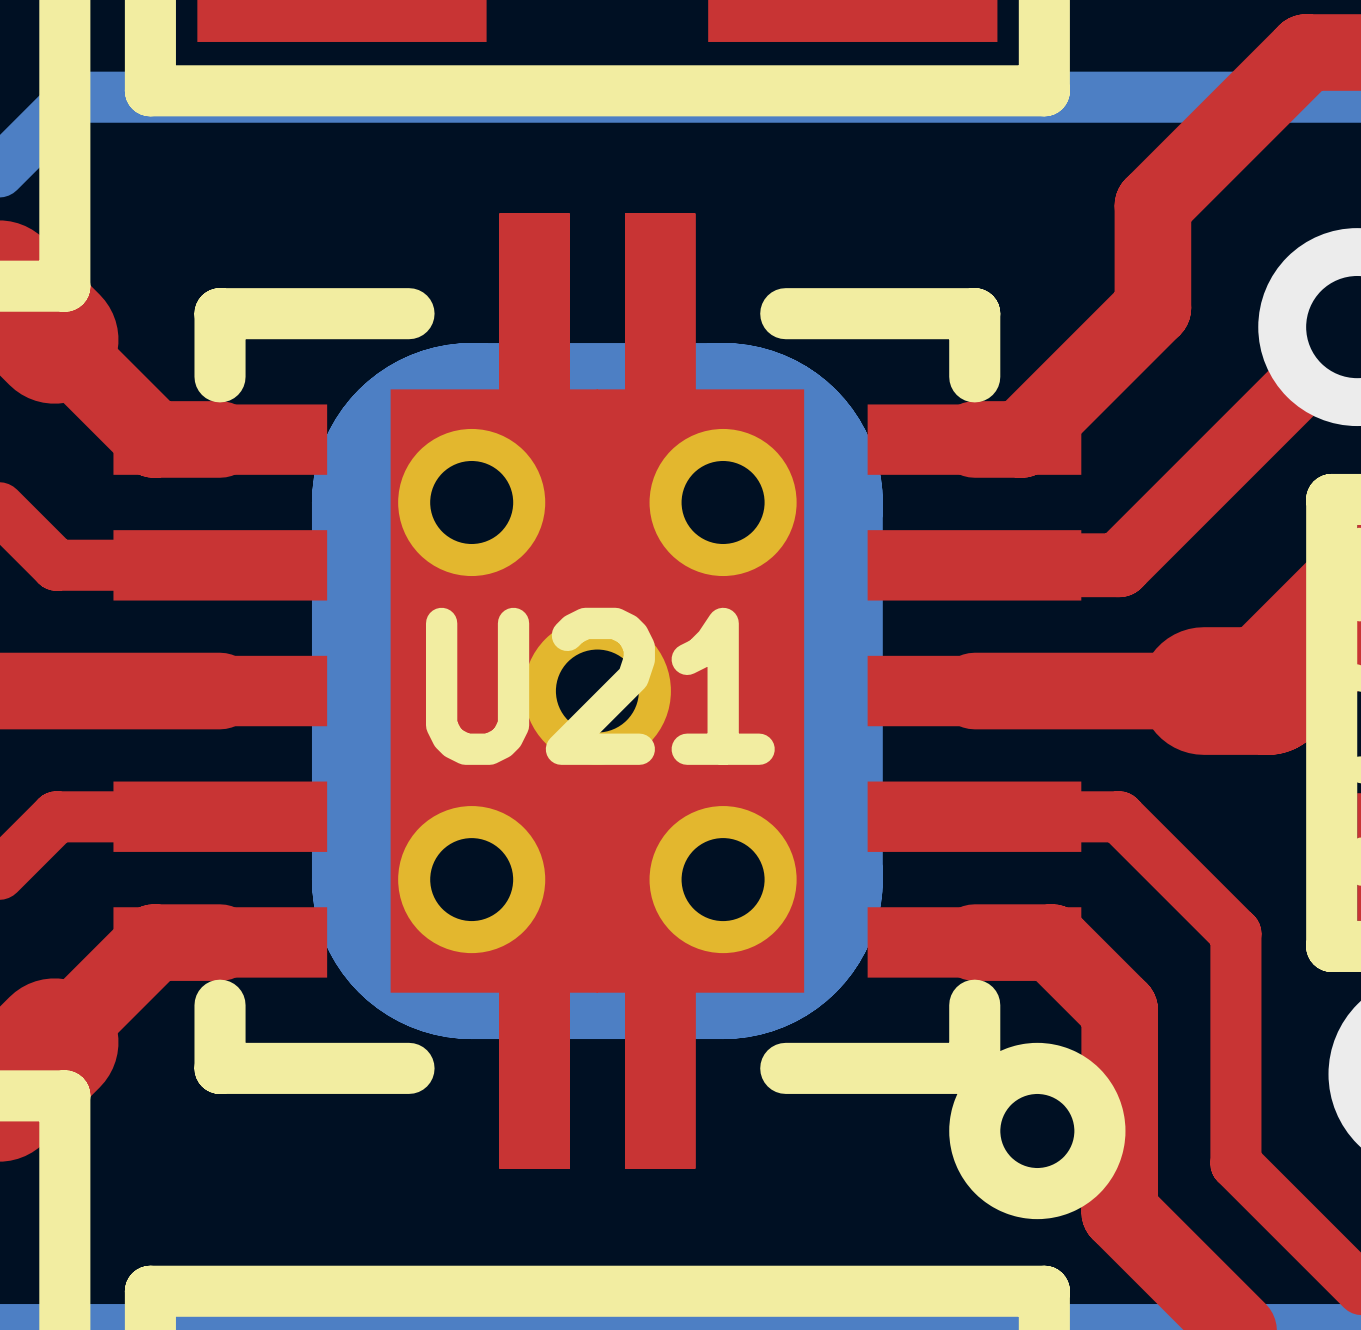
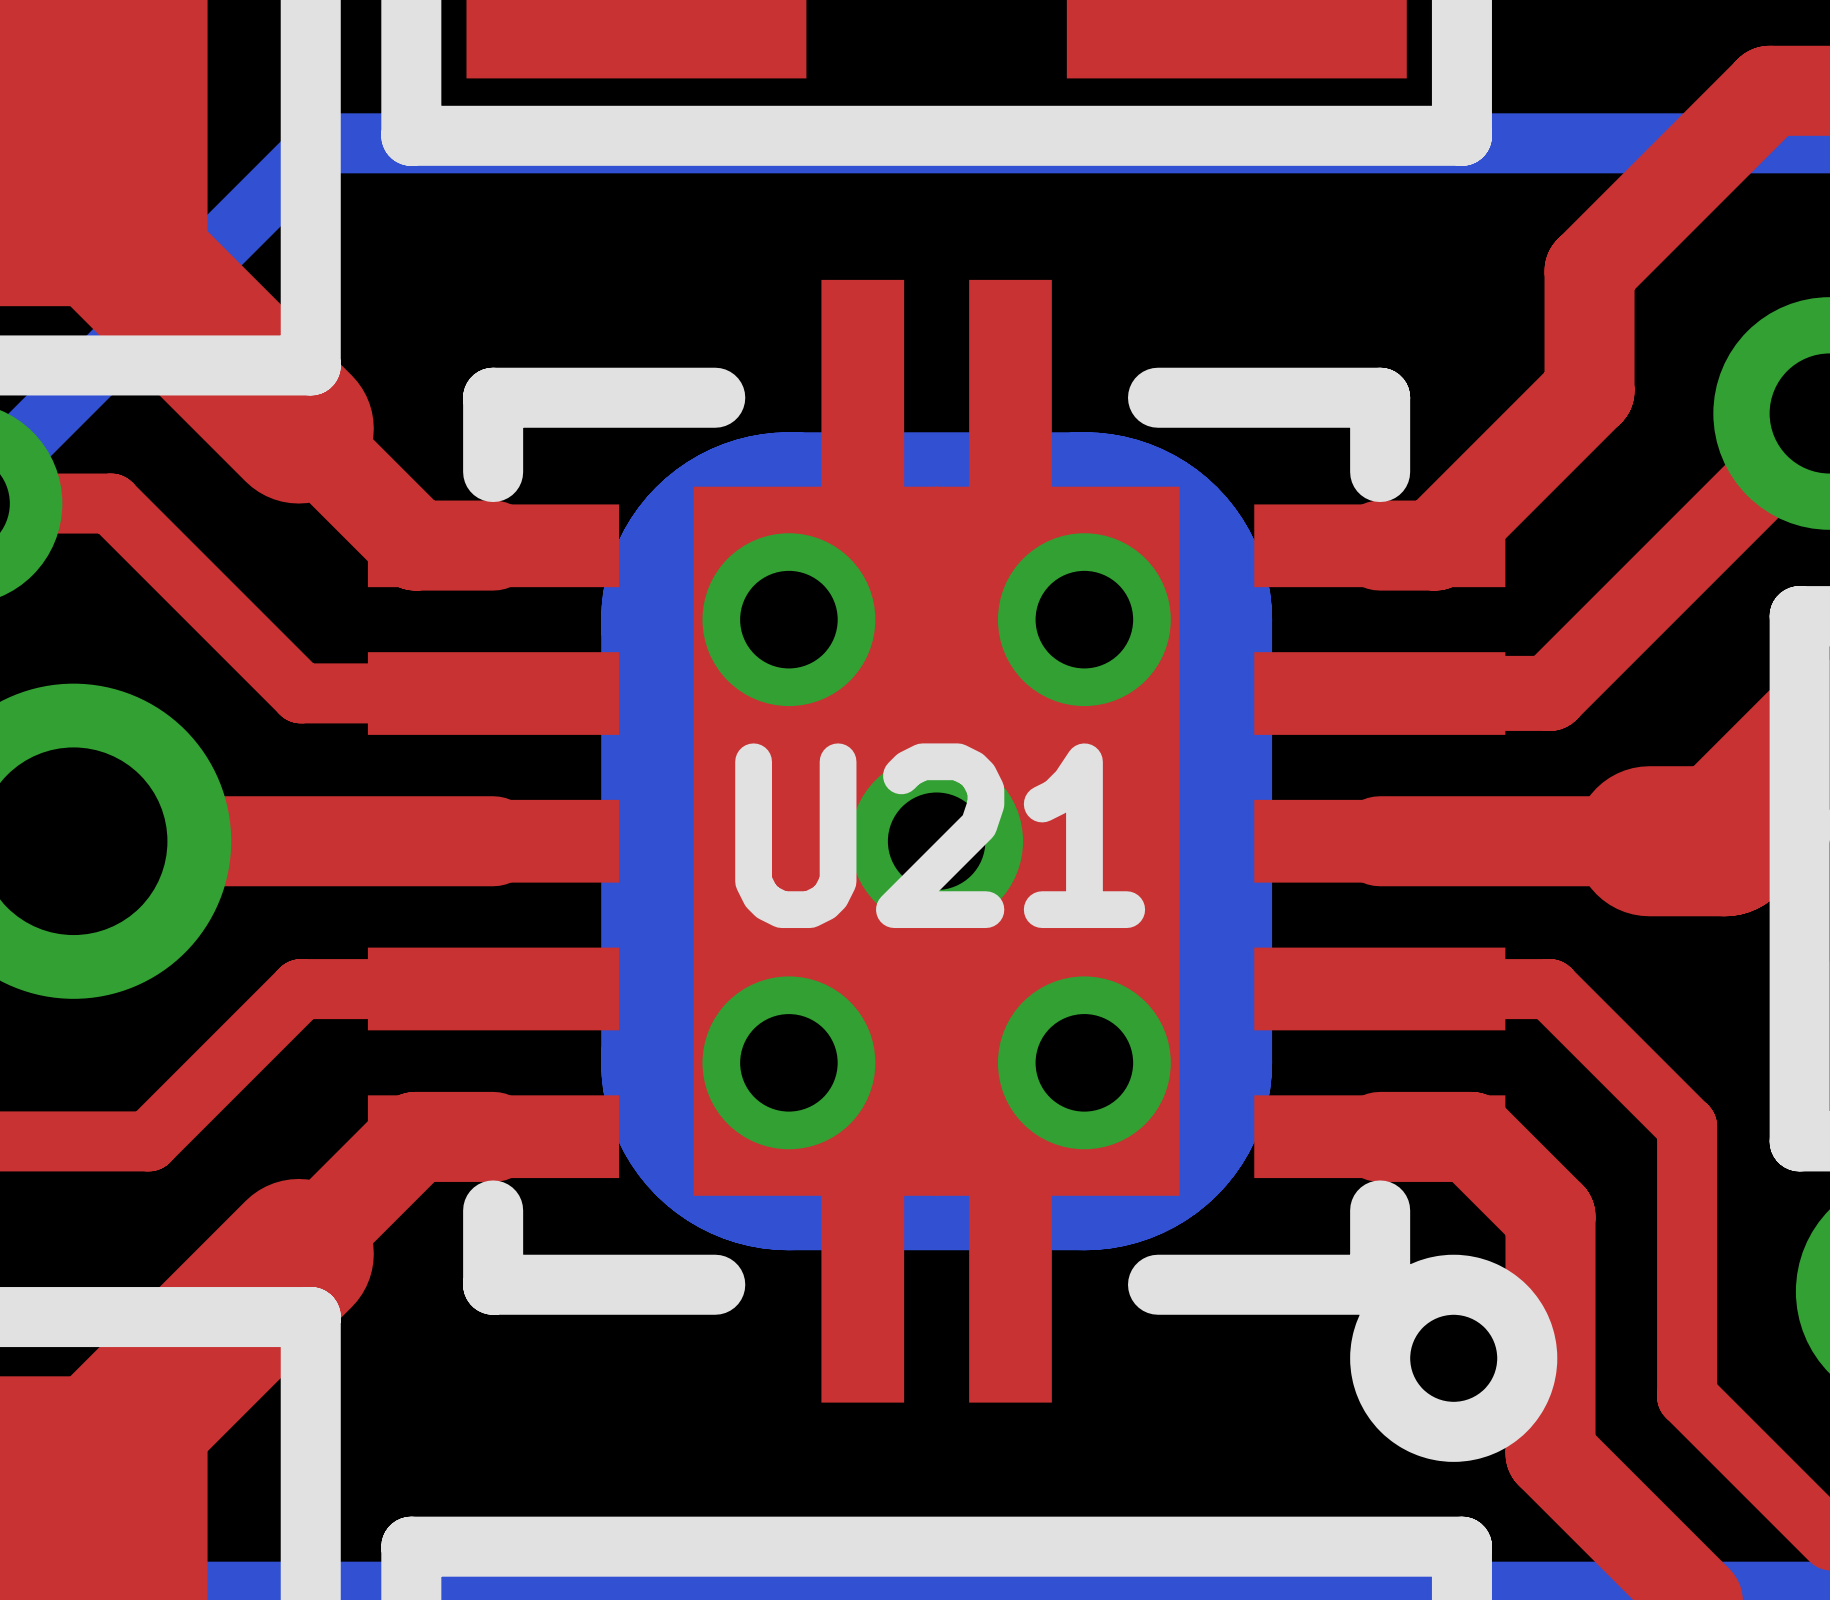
U21 footprint: [113, 213, 1126, 1220] -> [367, 279, 1558, 1462]

